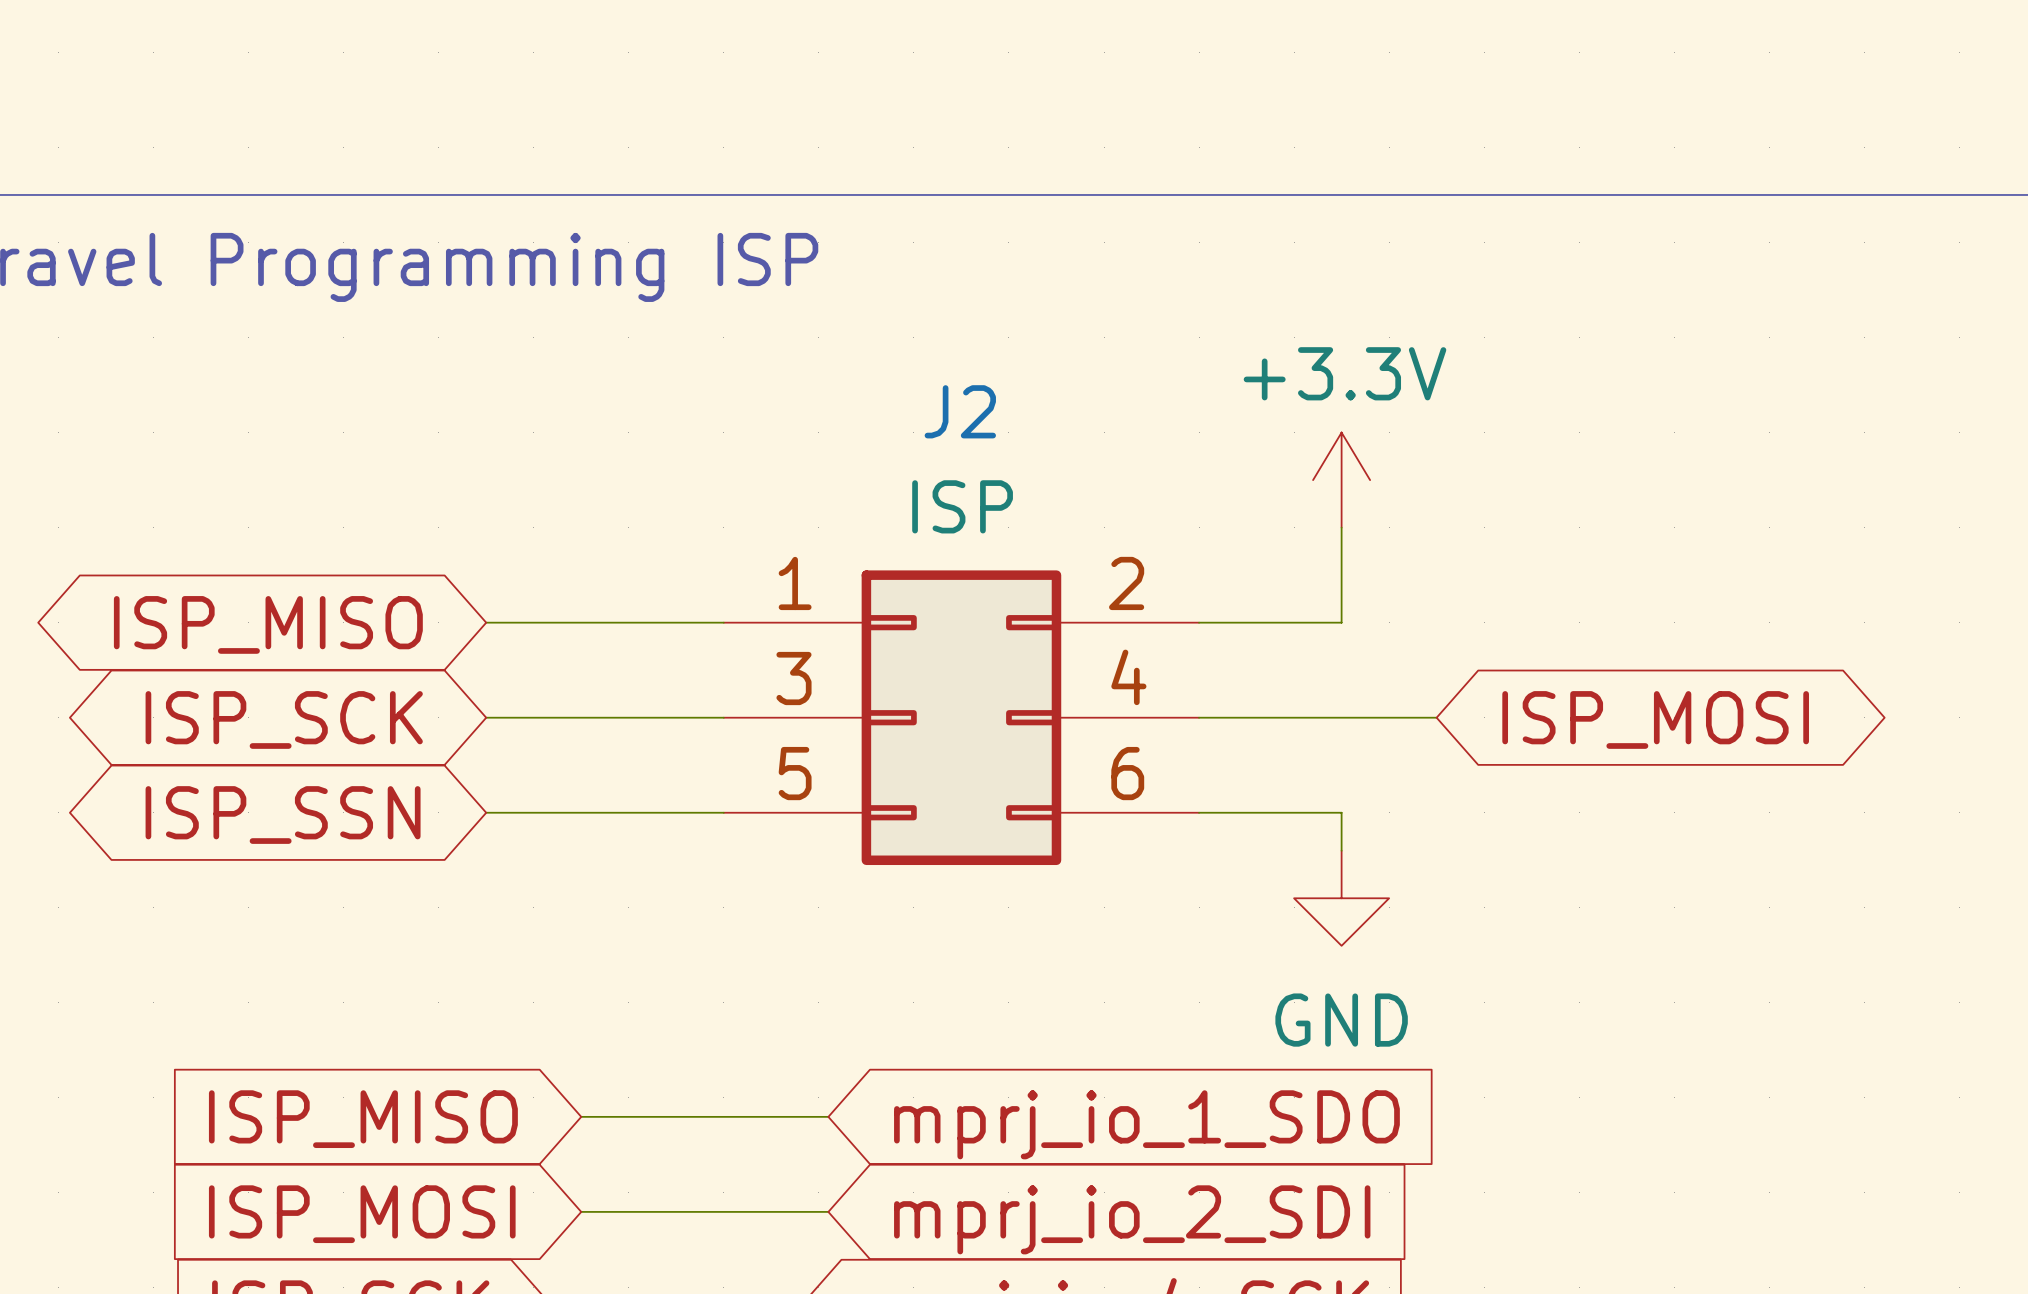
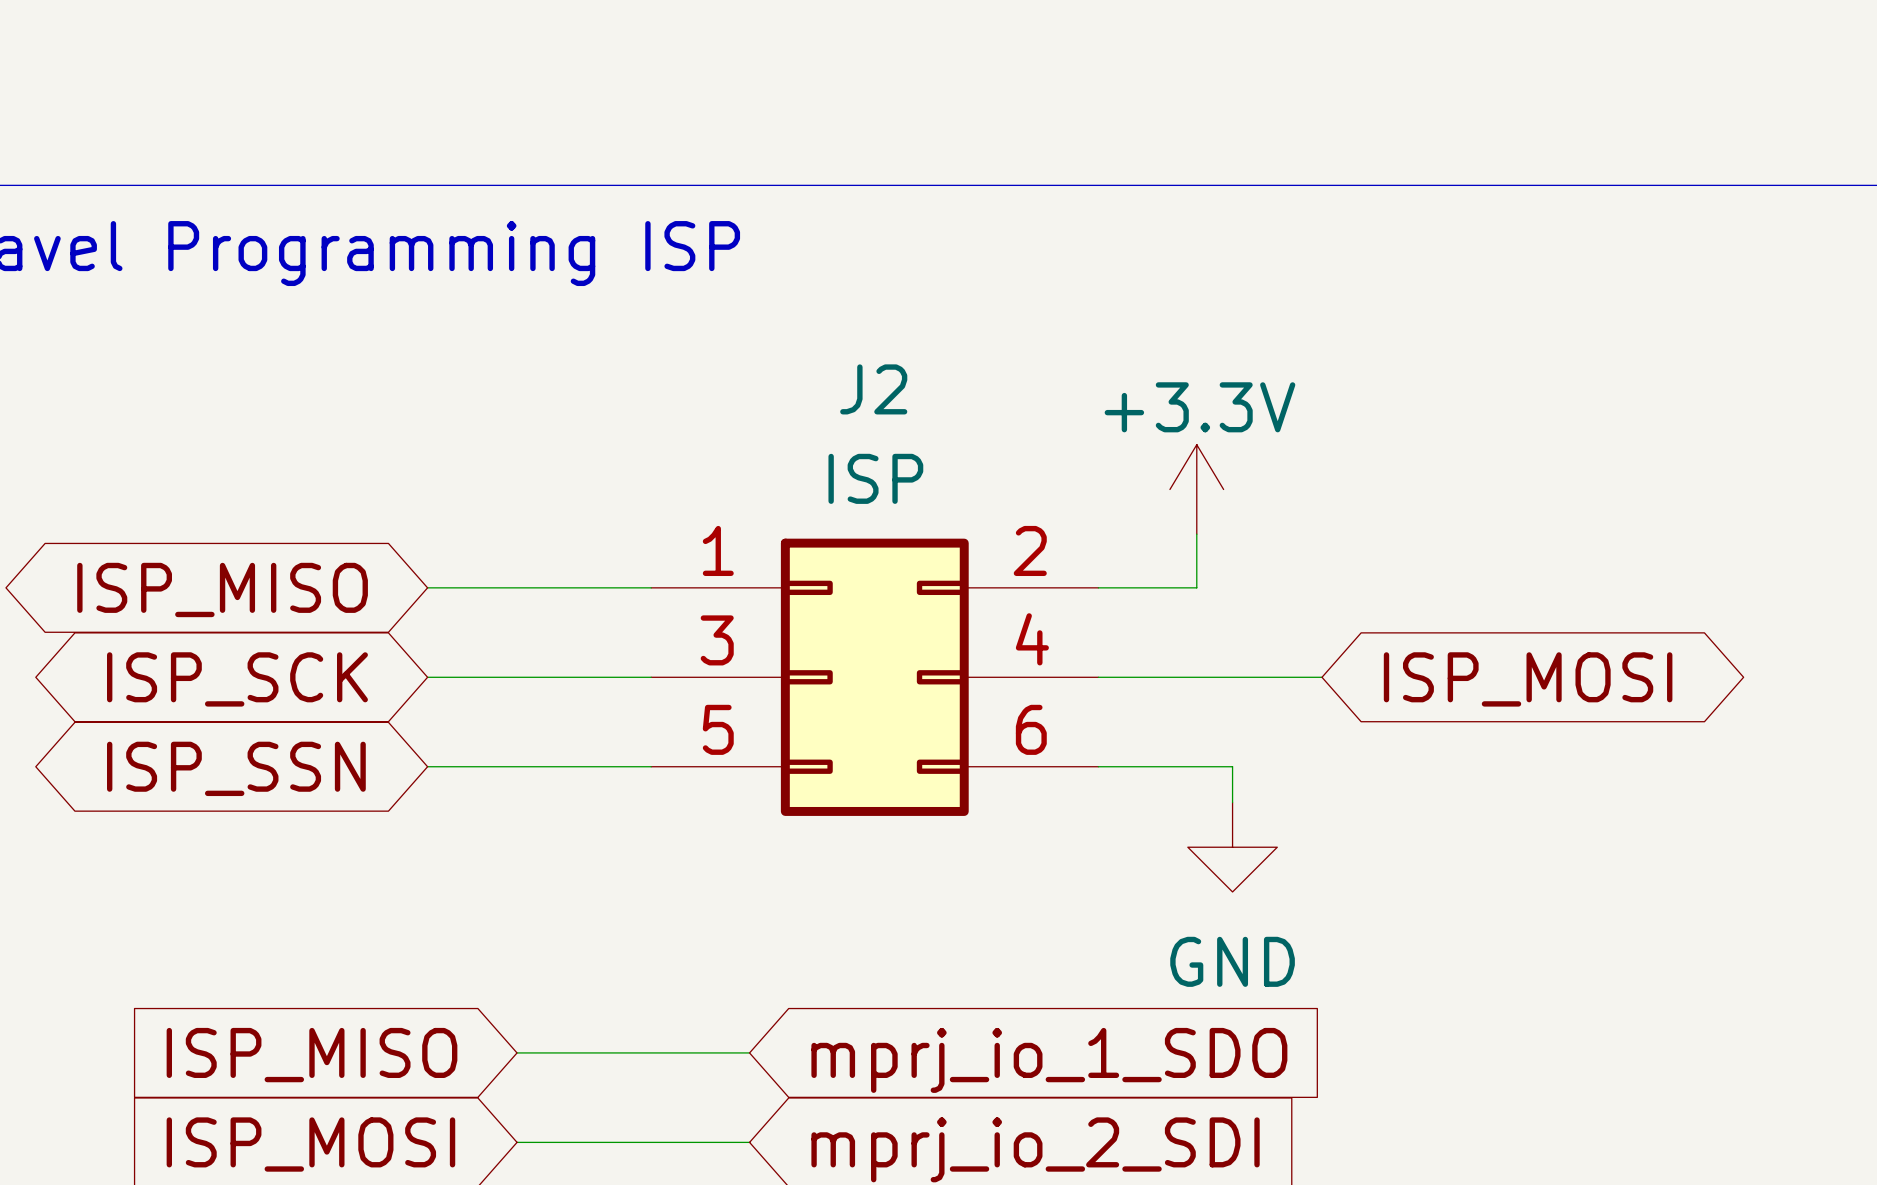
power symbol text position: +3.3V (1344, 373) -> +3.3V (1199, 407)
power symbol position: +3.3V (1341, 480) -> +3.3V (1196, 489)
wire: (1341, 527) (1341, 622) (1303, 622) -> (1196, 534) (1196, 587)

